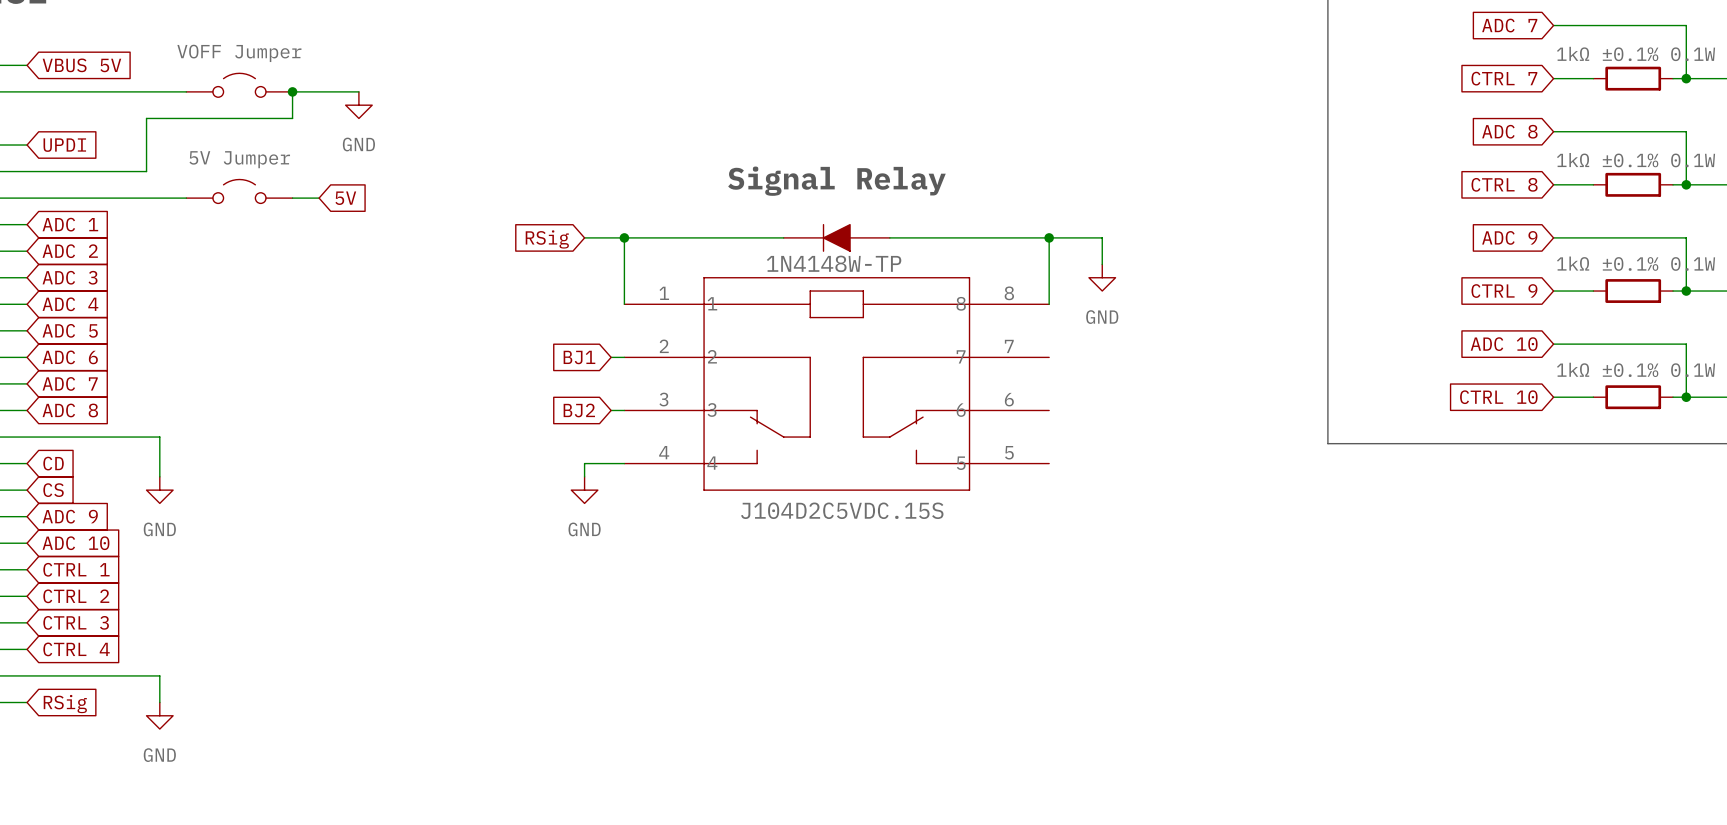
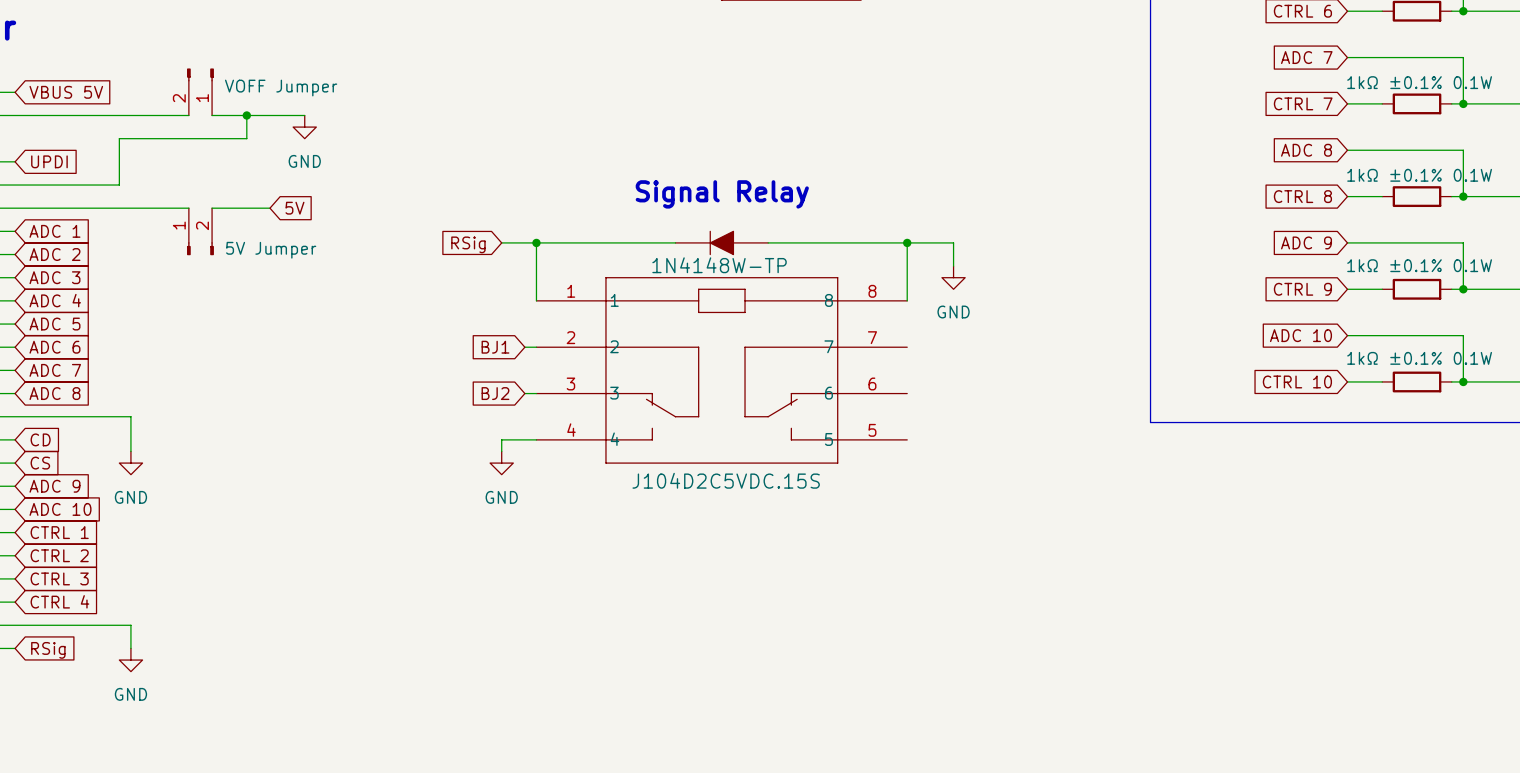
part: none -> VOFF Jumper (200, 91)
part: VOFF Jumper (239, 85) -> none
part: 5V Jumper (239, 191) -> none
part: none -> 5V Jumper (200, 231)

